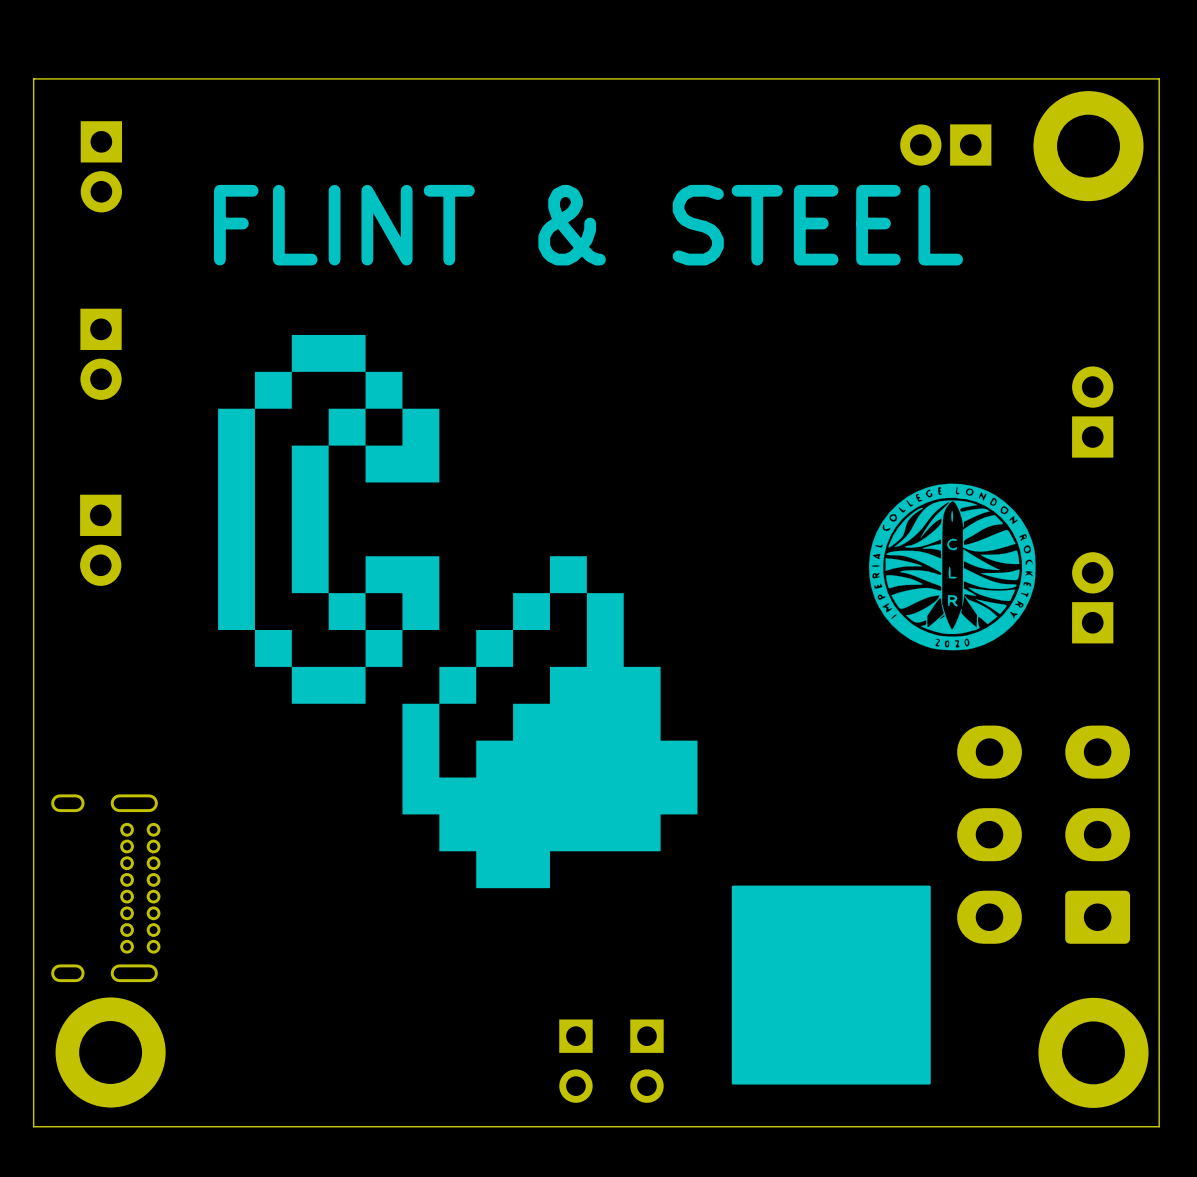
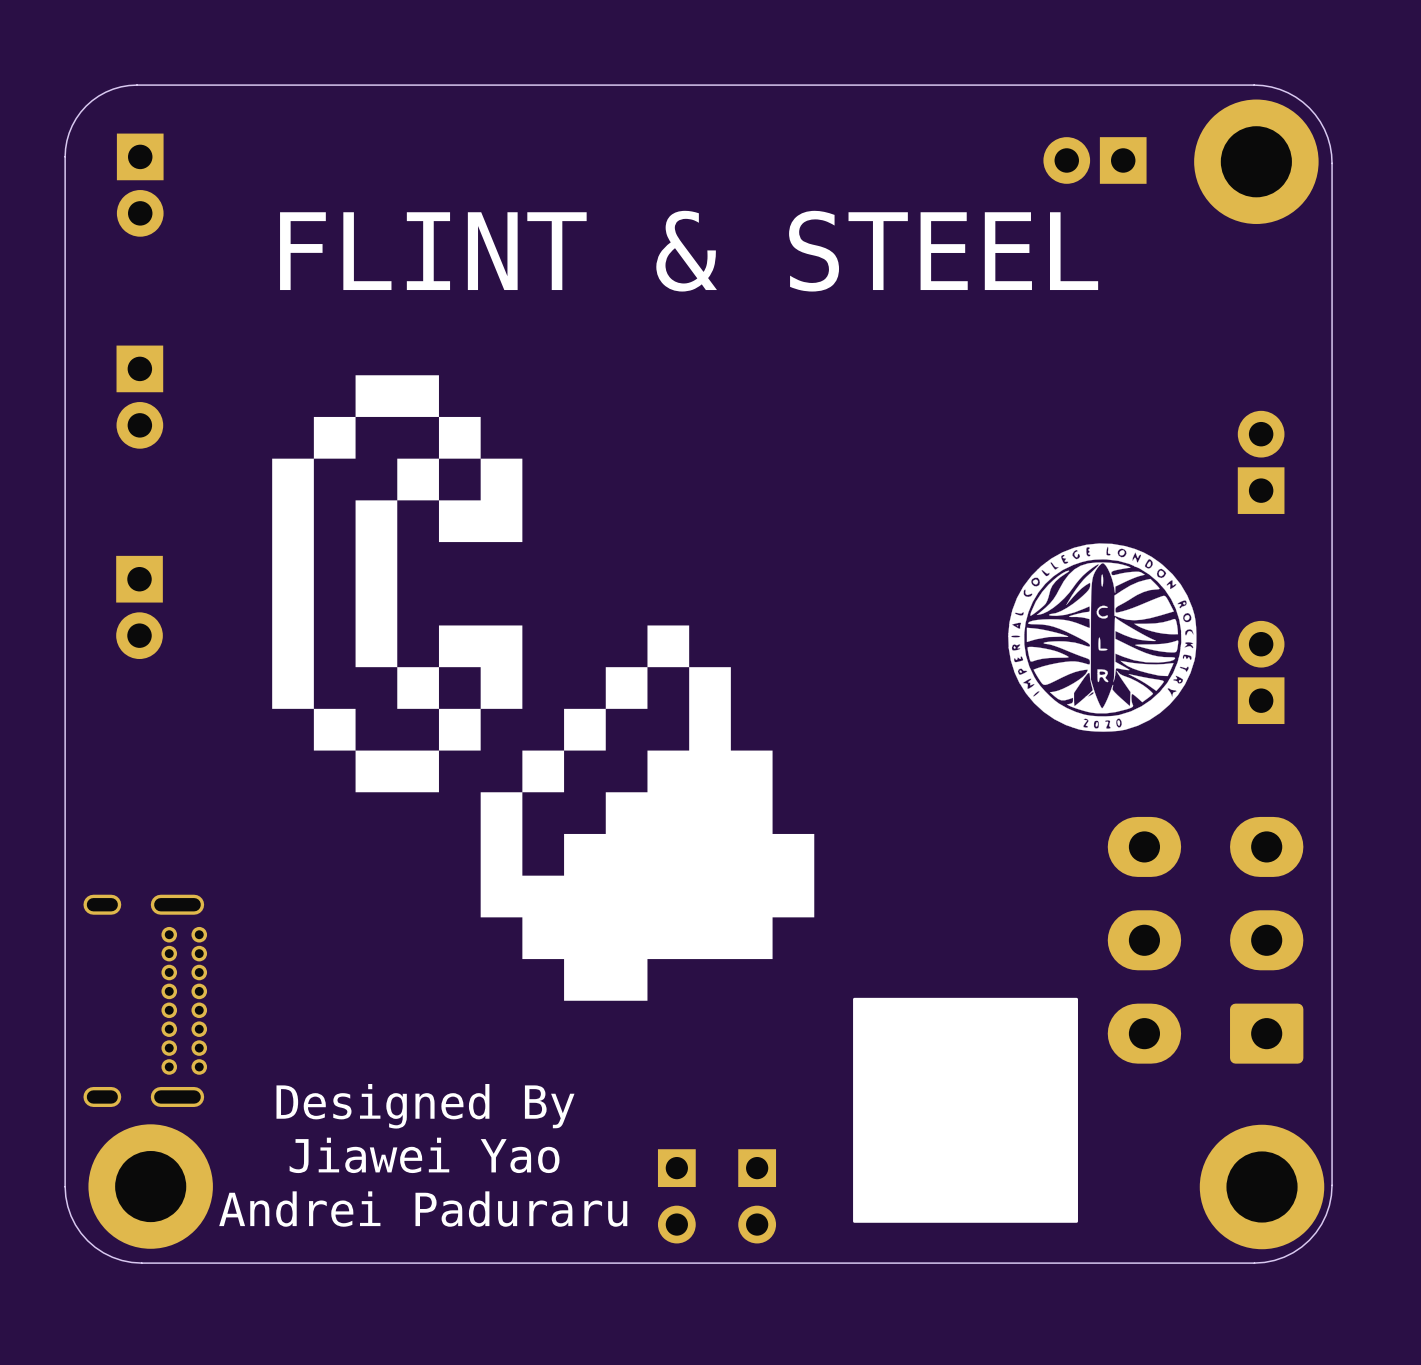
board edge: (1159, 78) (33, 78) (33, 1126) (1159, 1126) (1159, 78) -> (1254, 85) (1271, 87) (1288, 92) (1309, 108) (1320, 121) (1327, 137) (1332, 163) (1332, 1185) (1326, 1215) (1309, 1240) (1284, 1257) (1254, 1263) (141, 1263) (112, 1257) (87, 1240) (71, 1216) (65, 1186) (65, 156) (69, 133) (76, 118) (86, 106) (105, 92) (121, 86) (137, 85) (1254, 85)
text: none -> Designed By (425, 1106)
text: none -> Jiawei Yao (424, 1155)
text: none -> Andrei Paduraru (423, 1209)

